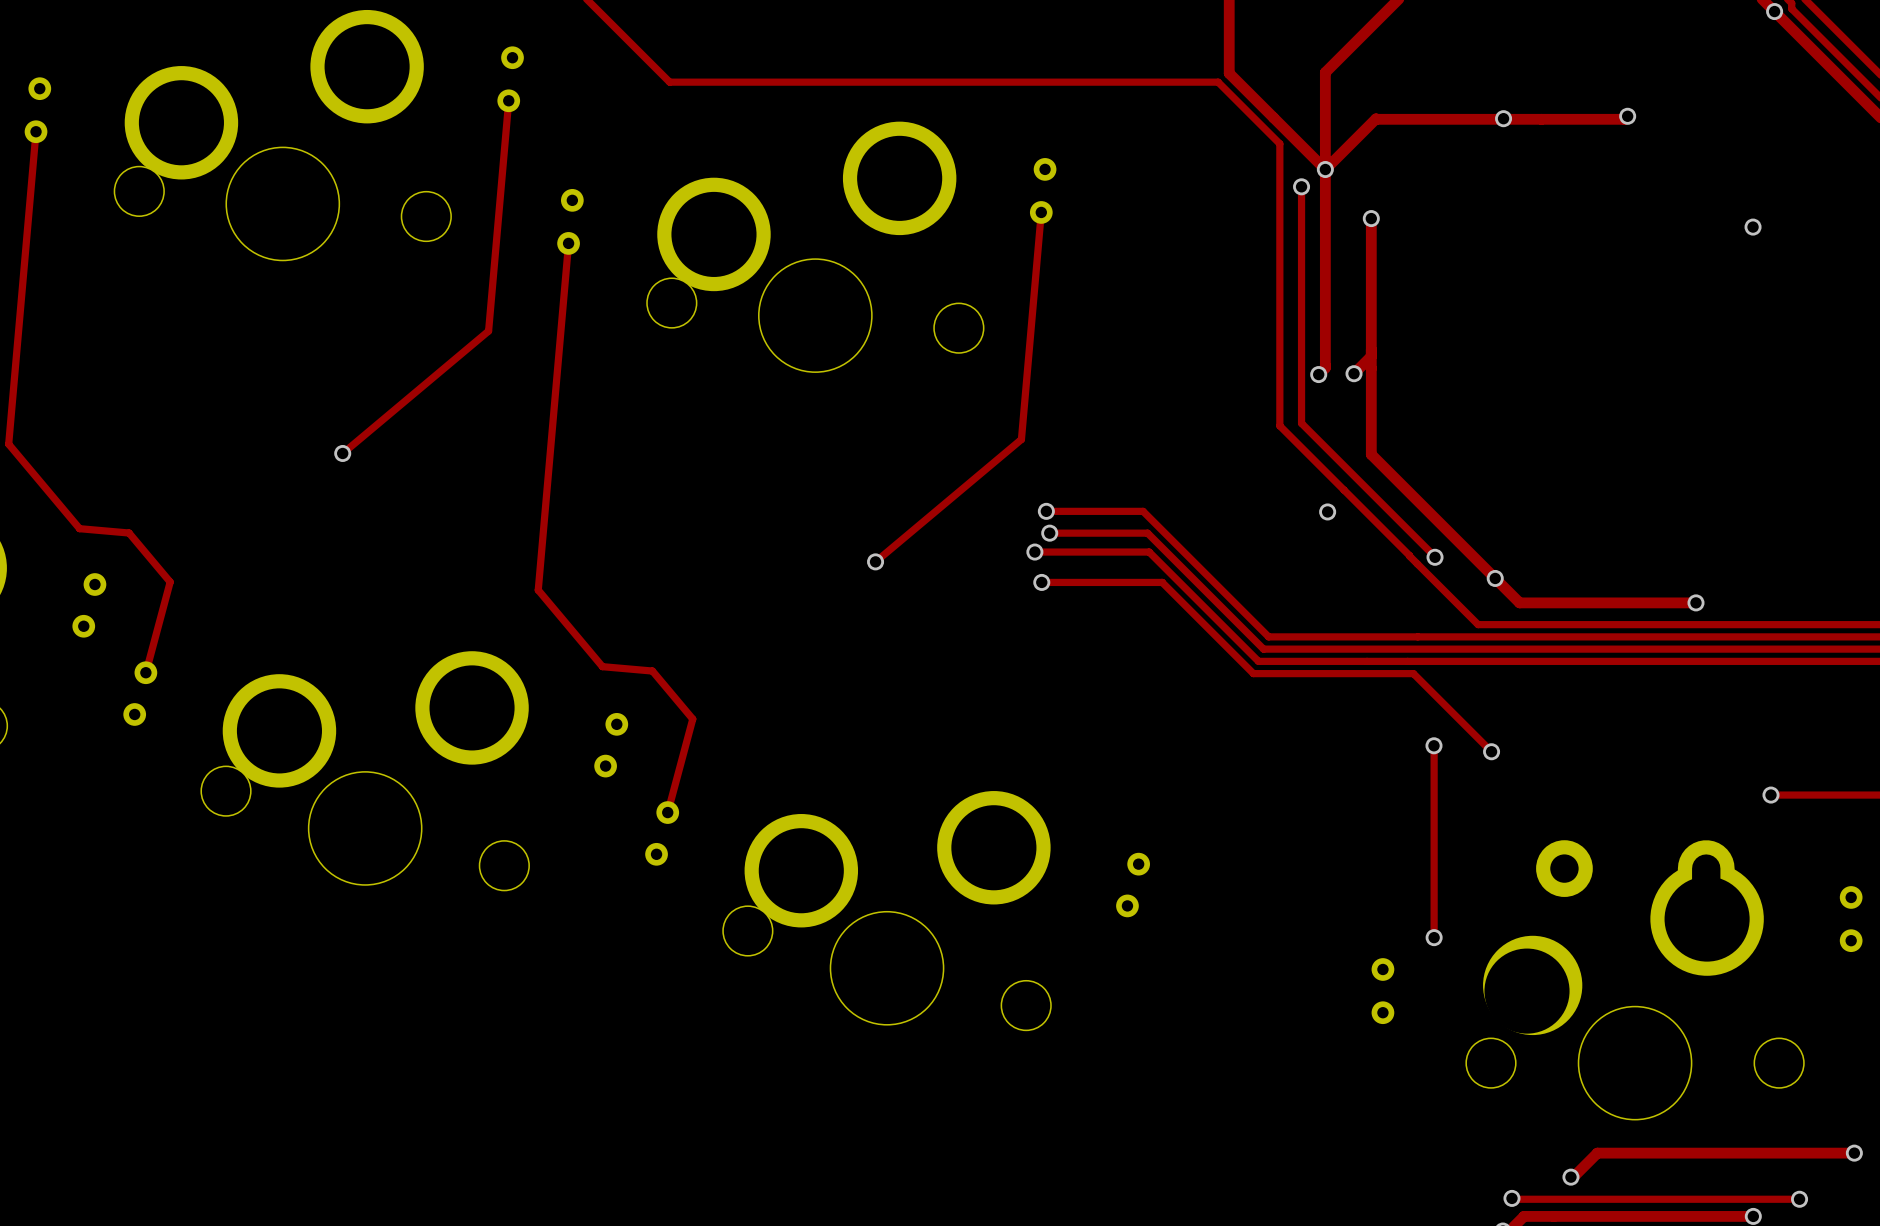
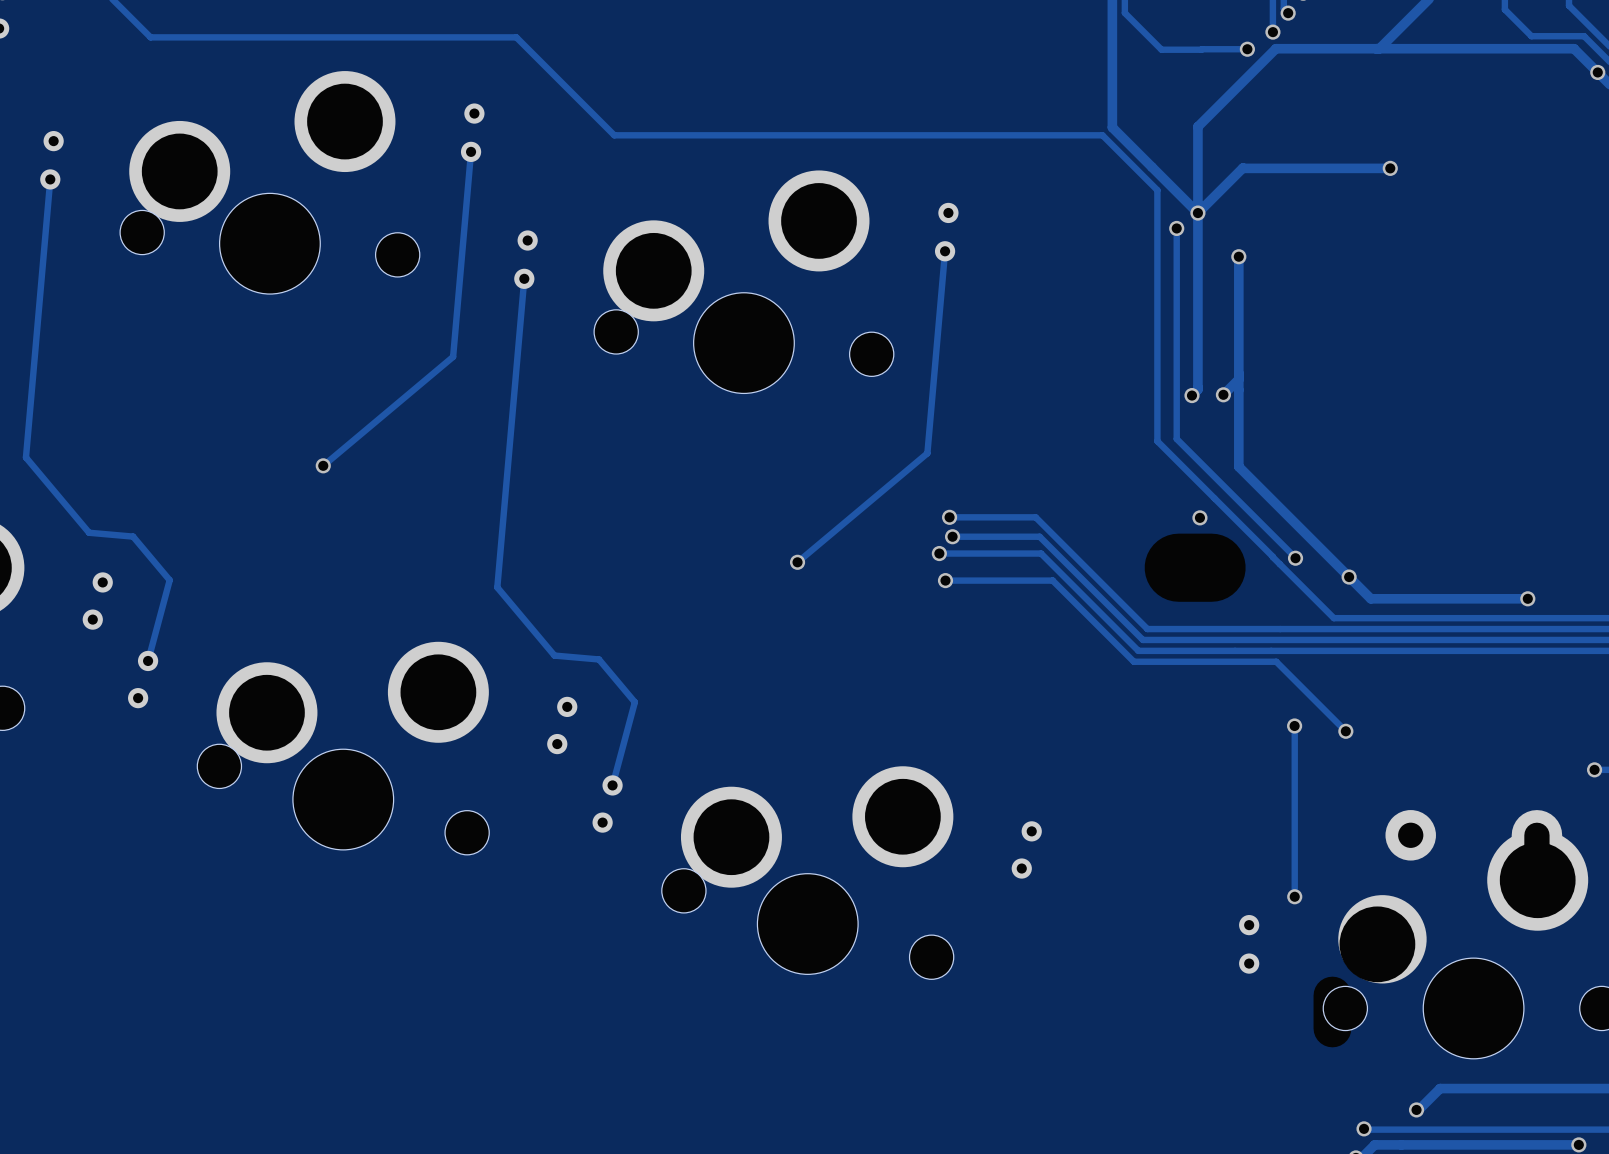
track: (1627, 116) (1624, 119) (1541, 119) -> none
via: (1627, 116) -> none
via position: (1503, 118) -> (1390, 168)
via: (1753, 227) -> none

